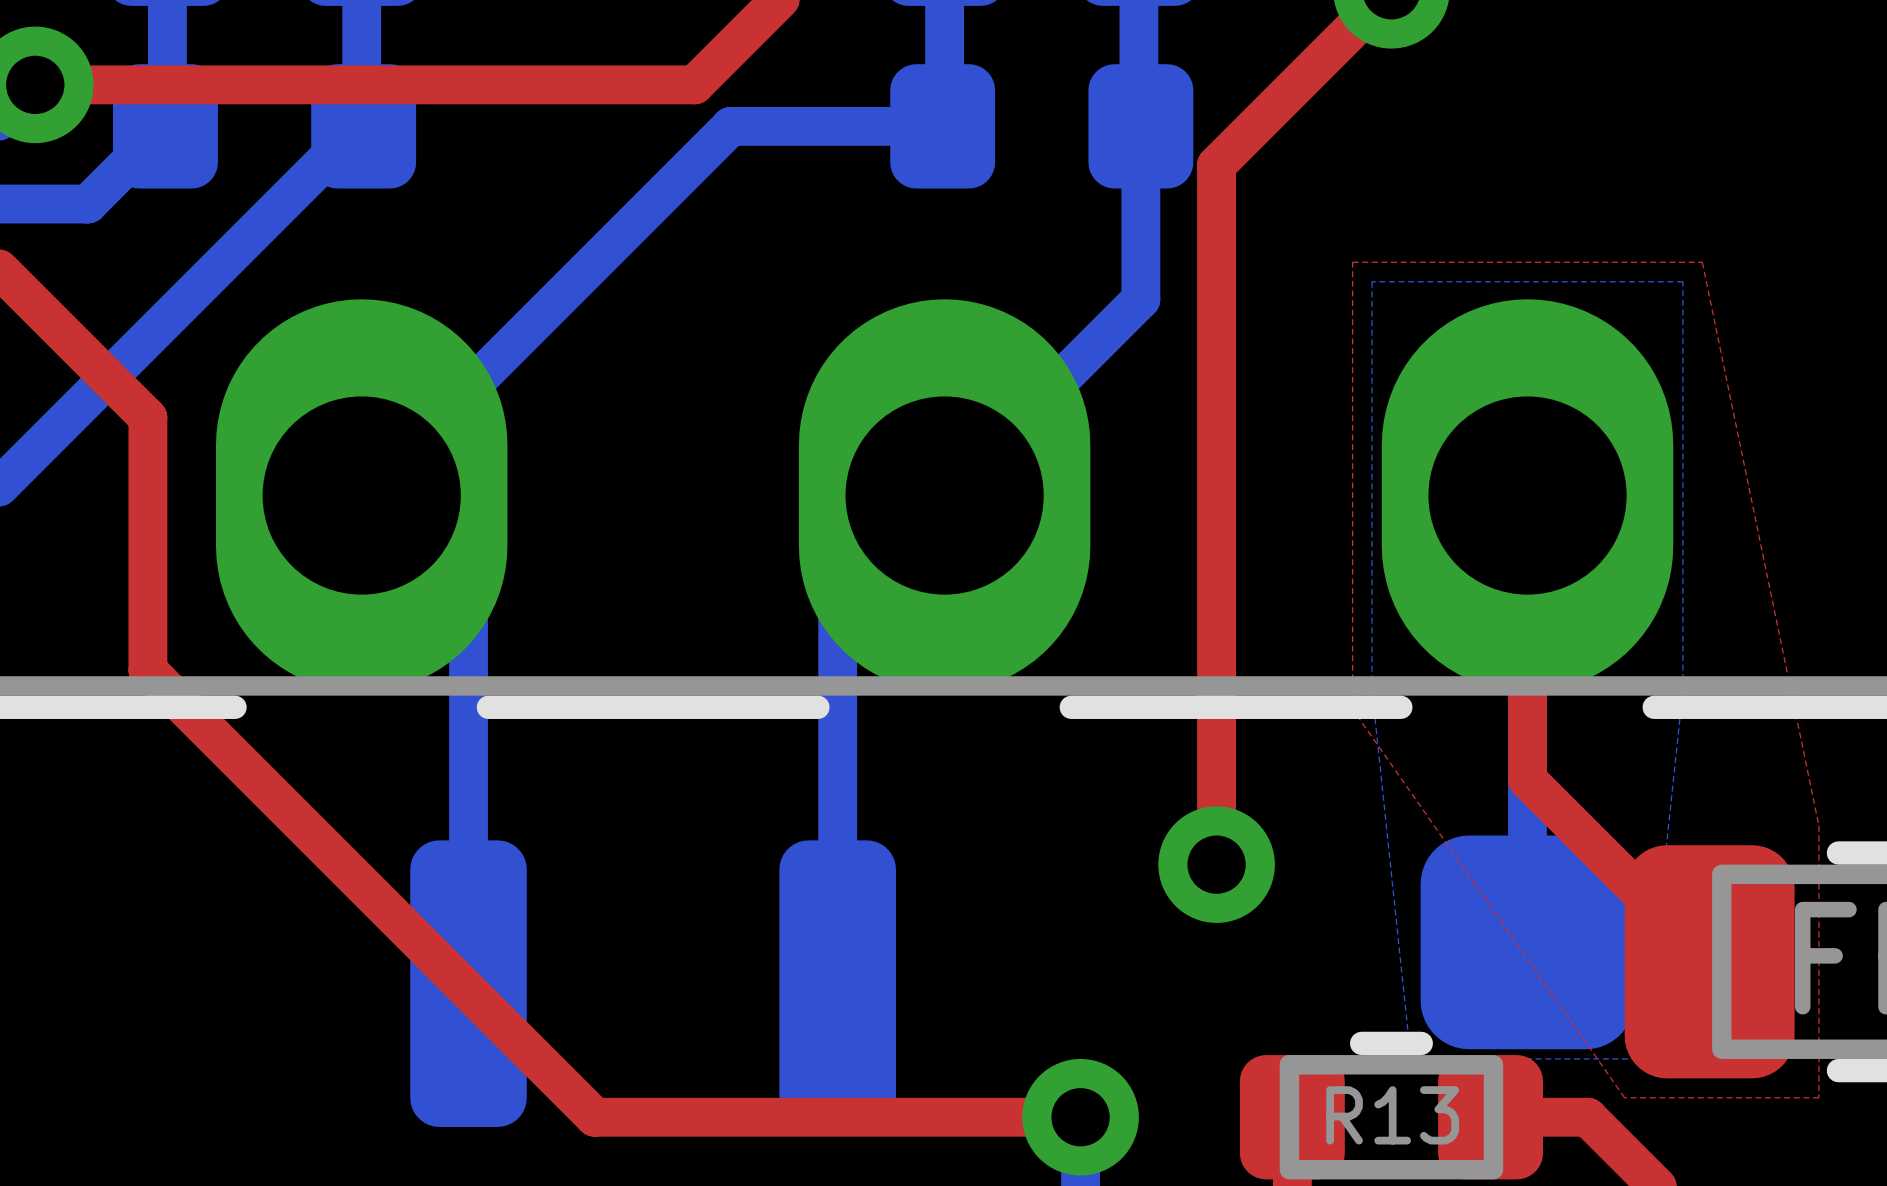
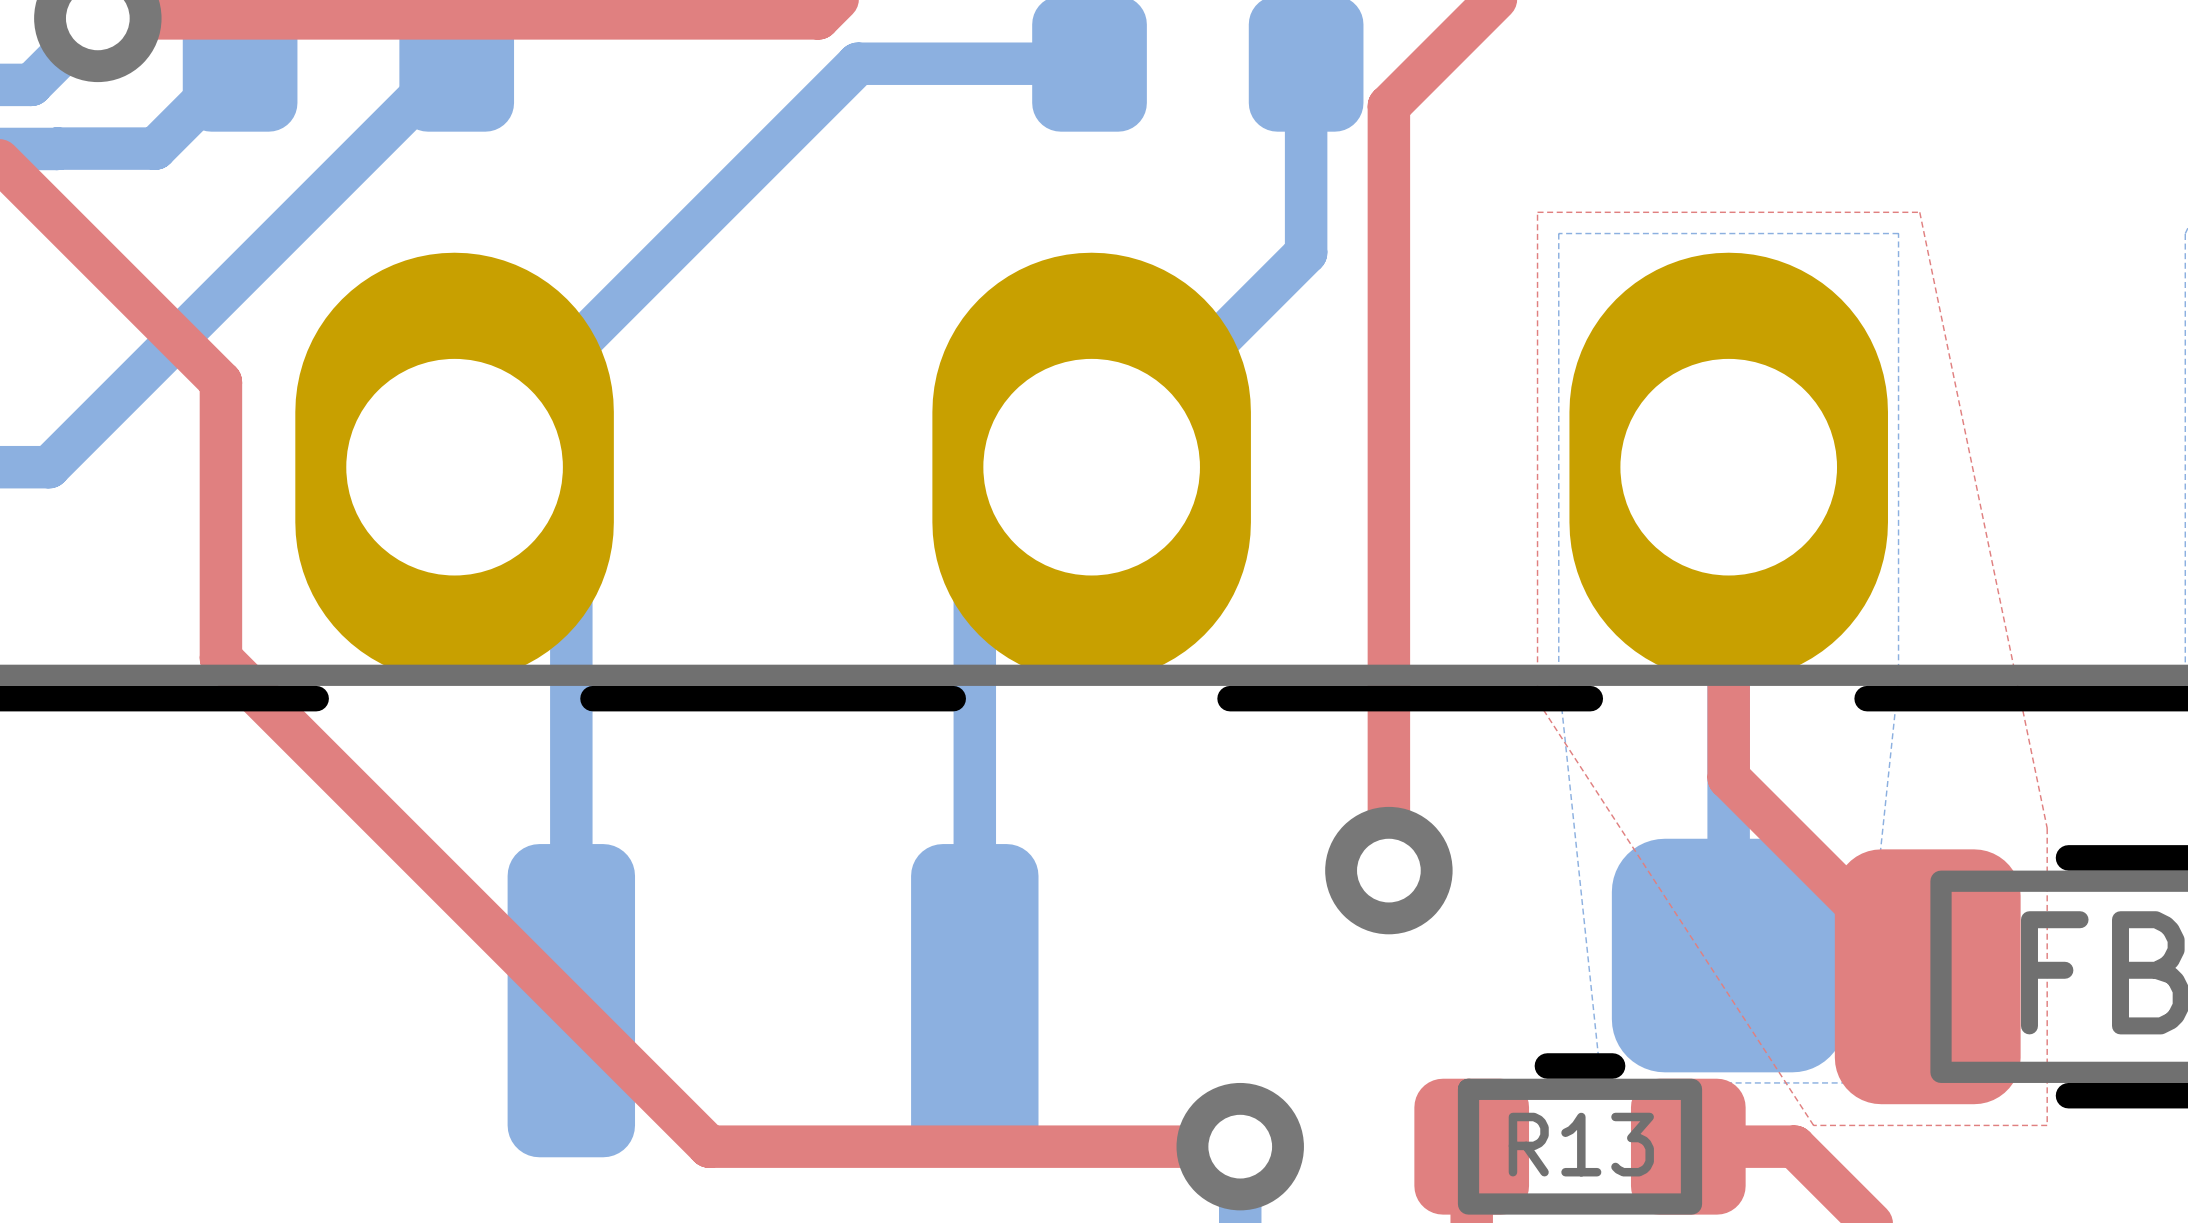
top zone outline: (1352, 709) (1624, 1097) -> (1537, 700) (1813, 1125) (1834, 1125)

